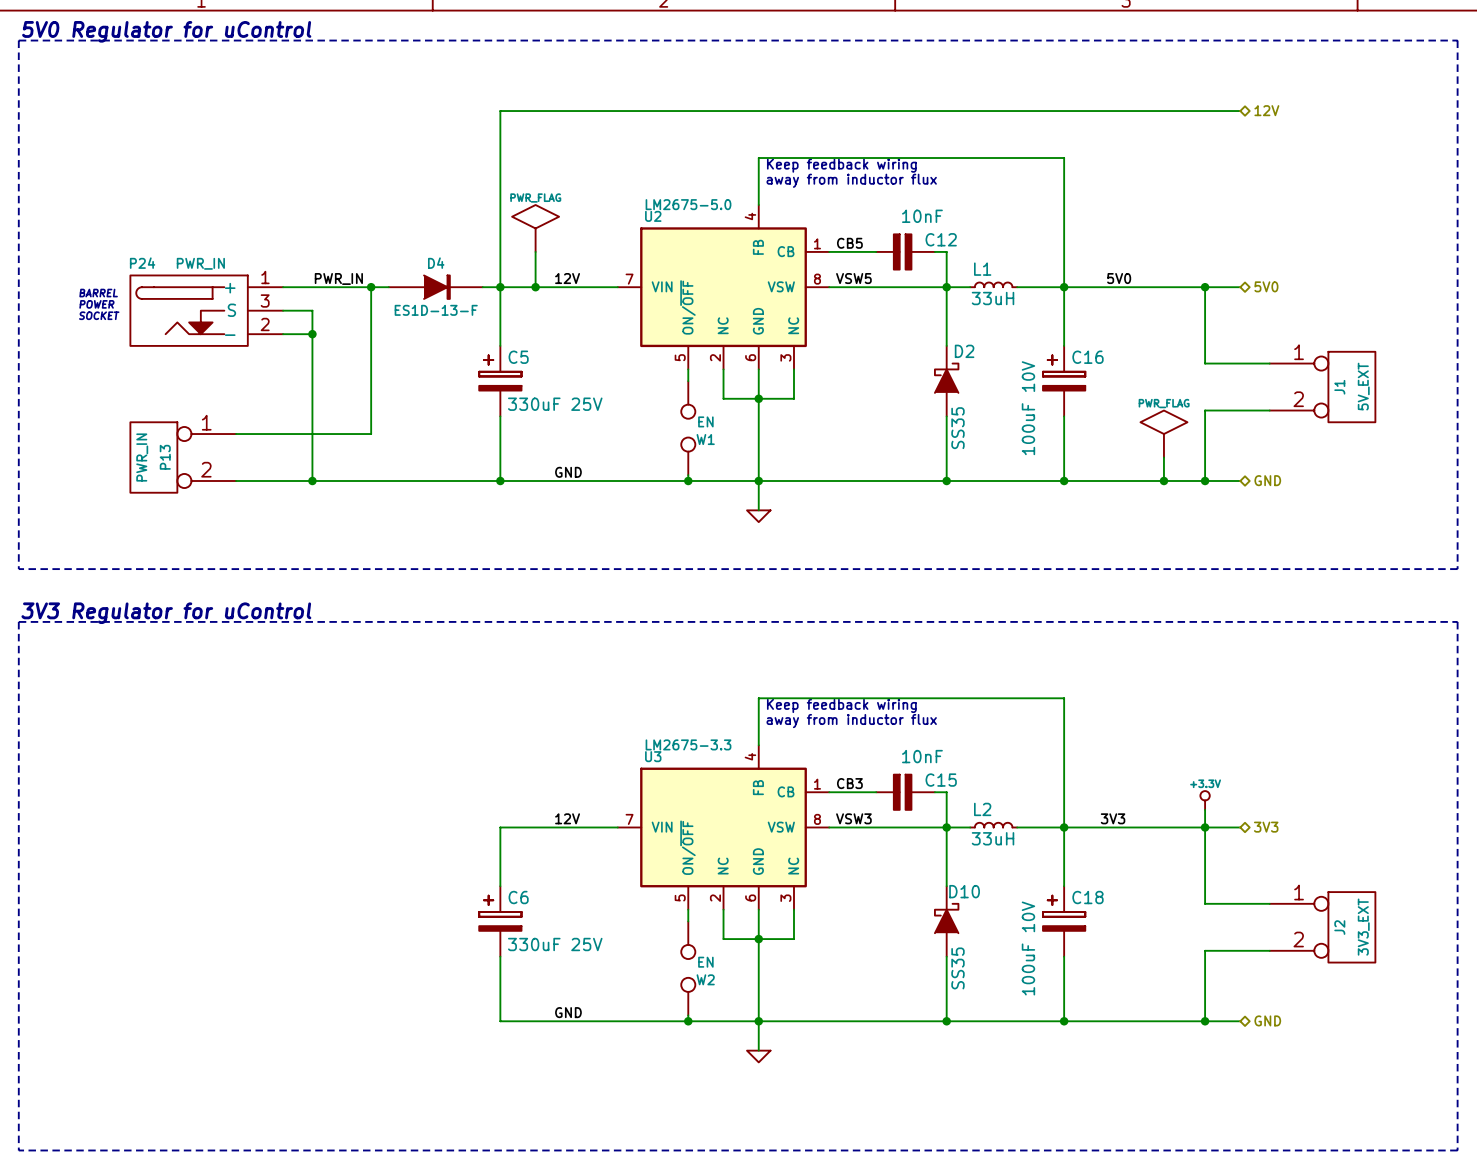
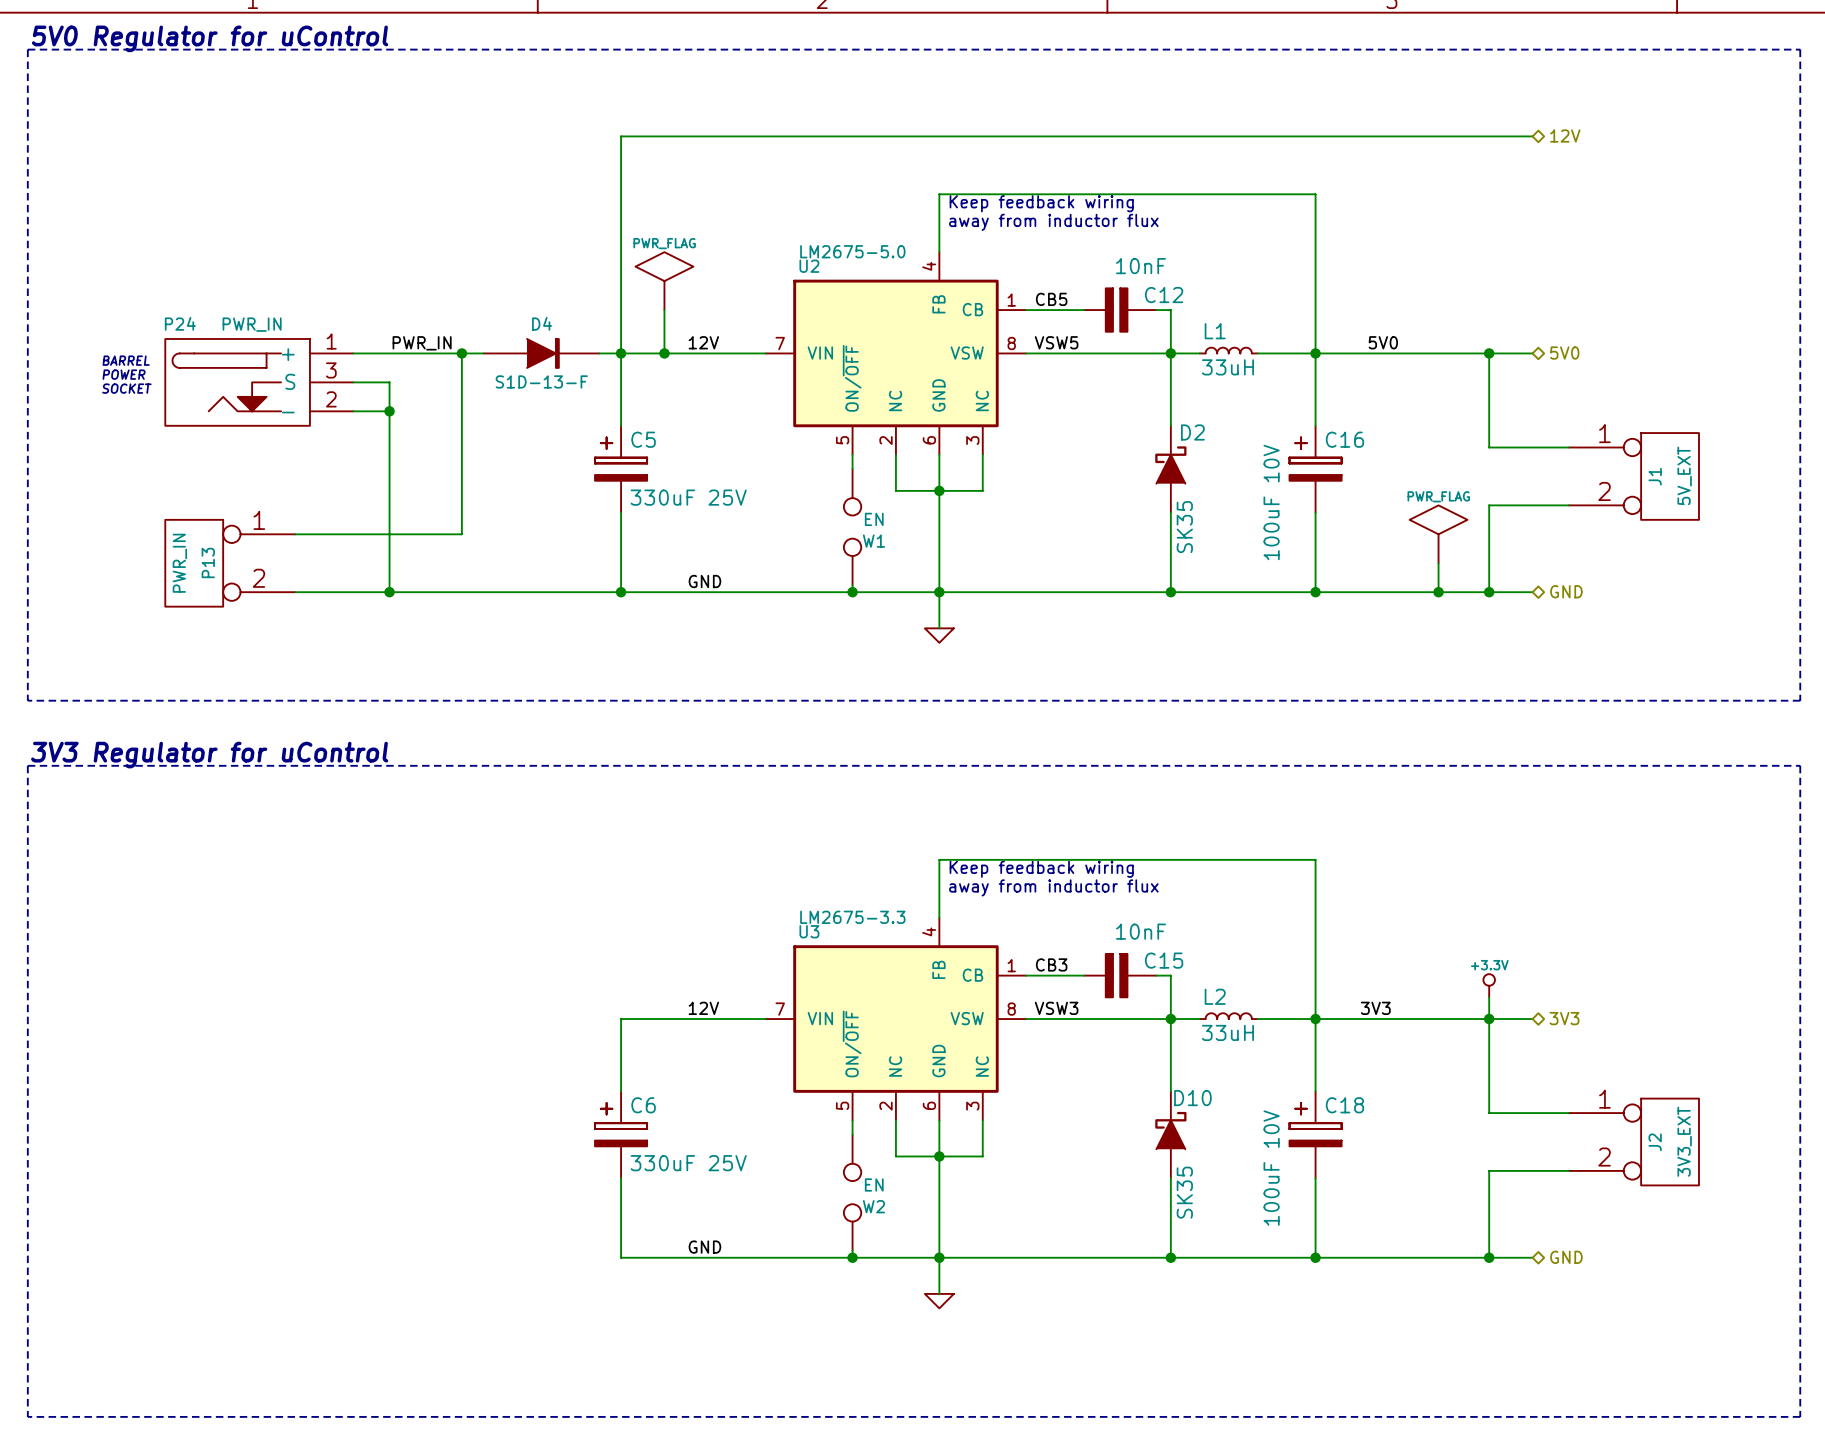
D4 value: ES1D-13-F (436, 310) -> S1D-13-F (541, 381)
D2 value: SS35 (957, 428) -> SK35 (1184, 527)
D10 value: SS35 (957, 968) -> SK35 (1184, 1192)

